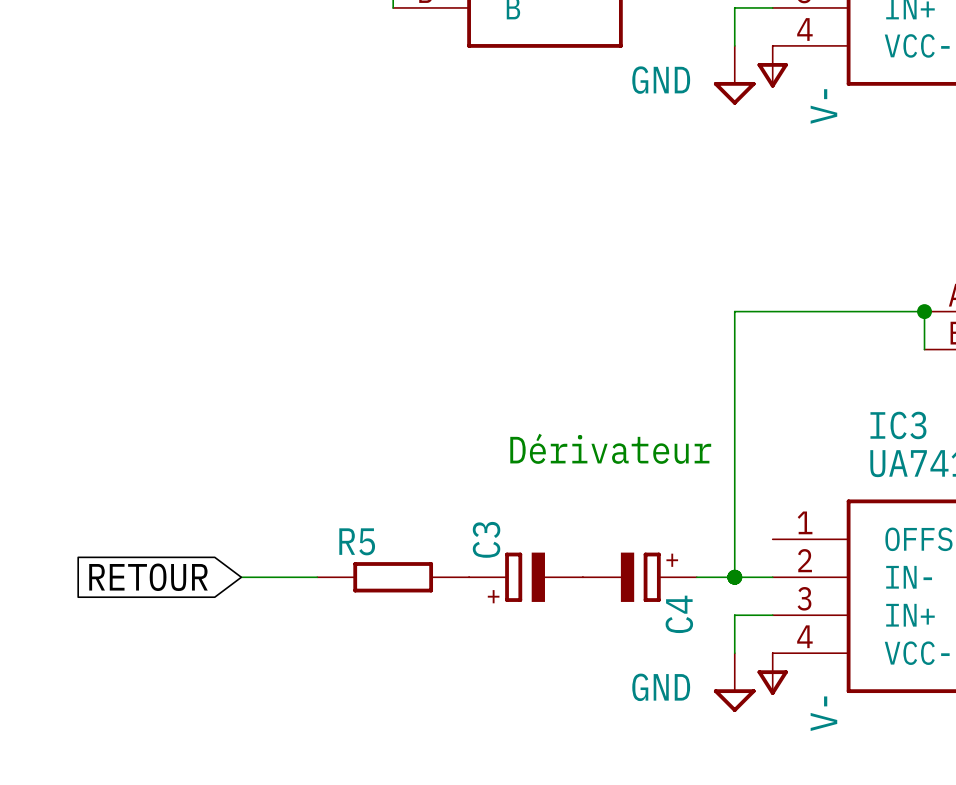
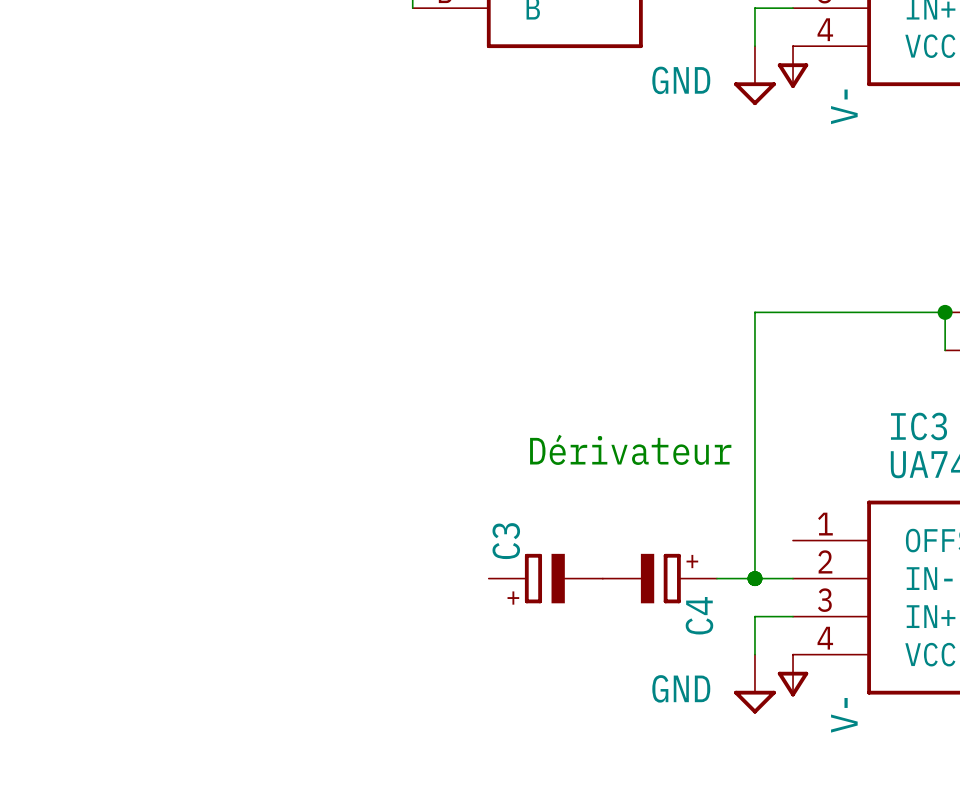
global label: RETOUR (148, 577) -> none
wire: (241, 577) (317, 577) -> none
R5: (393, 577) -> none

